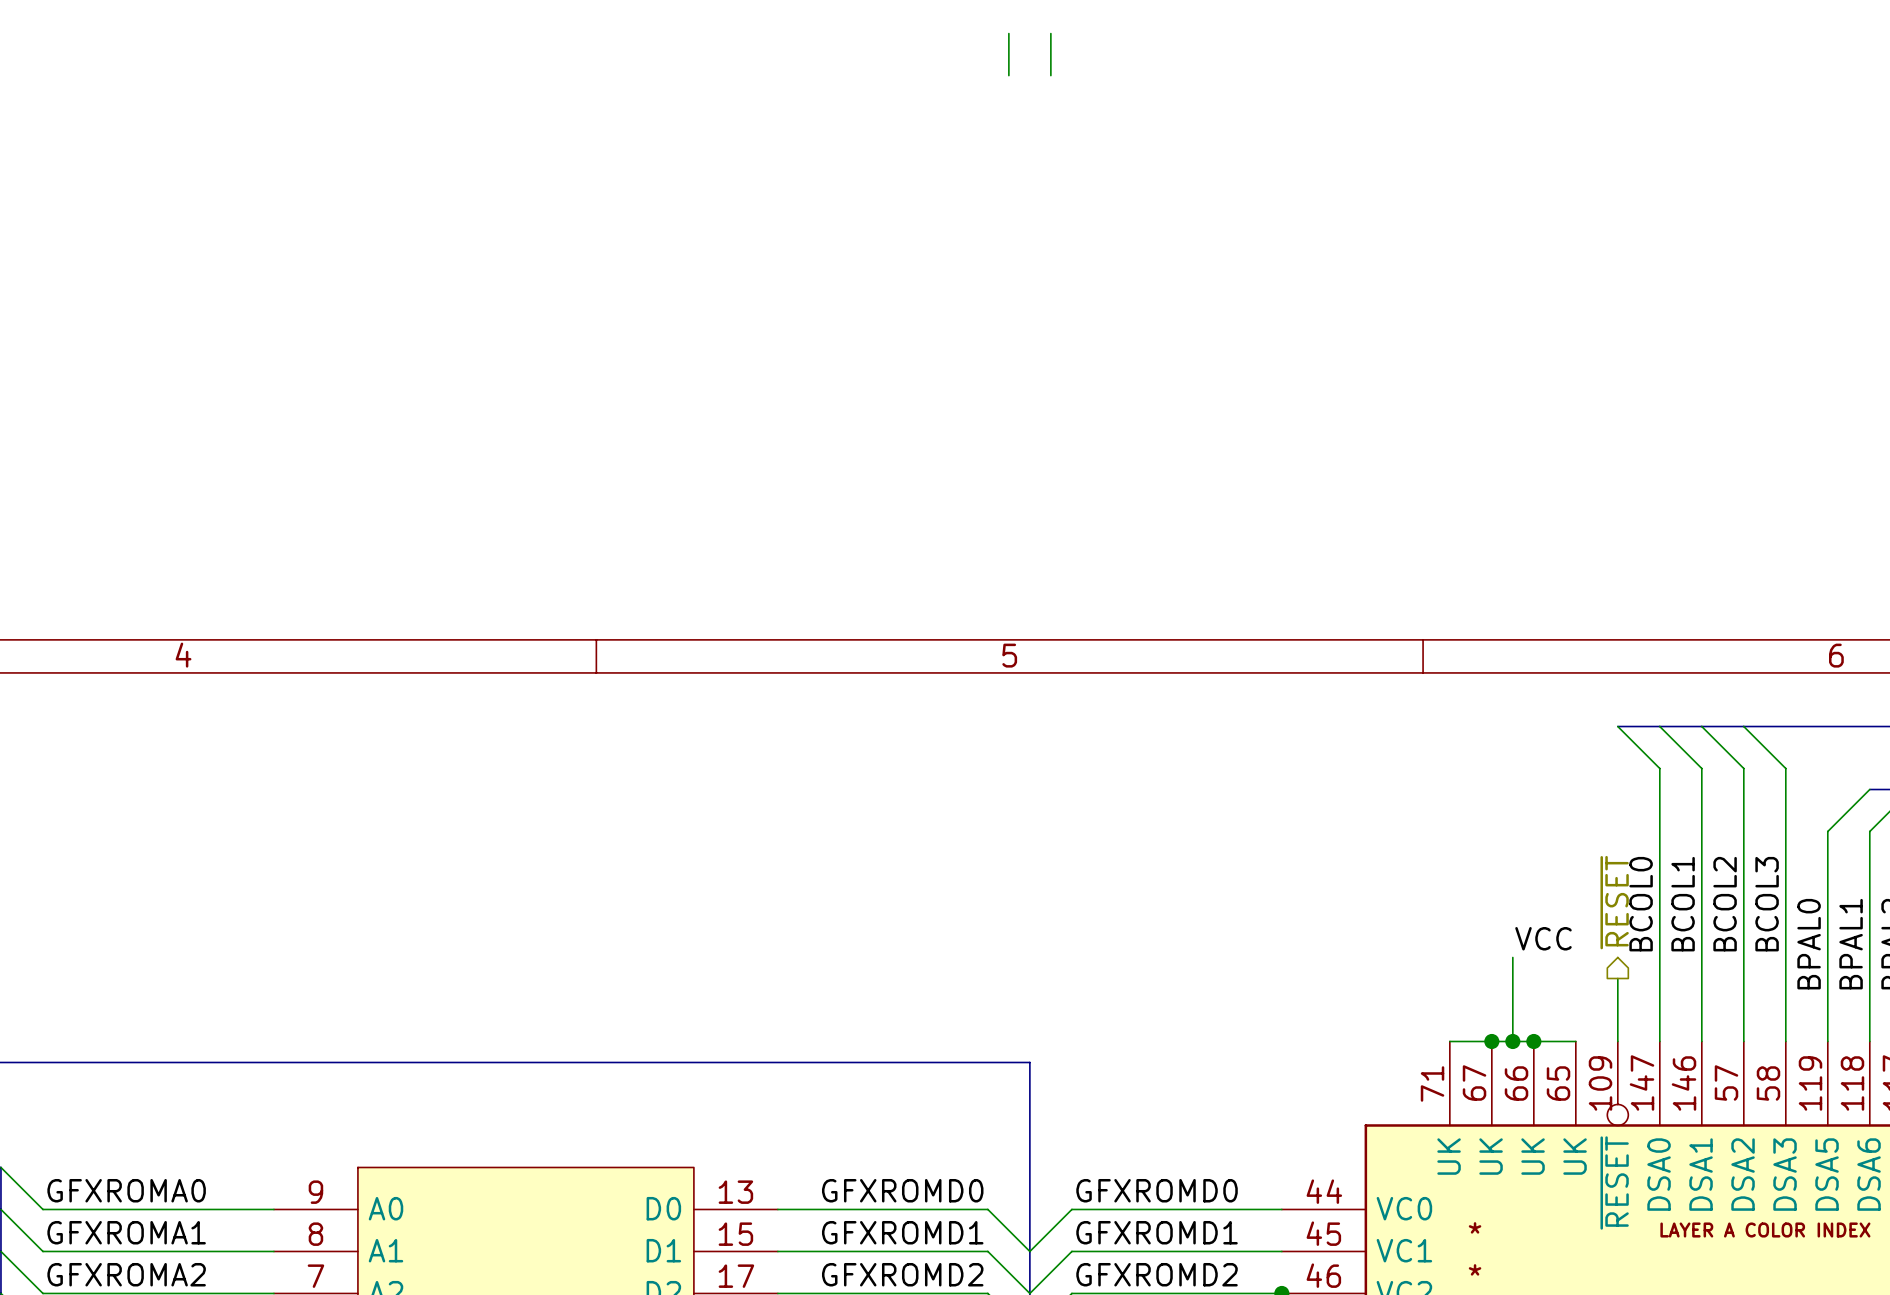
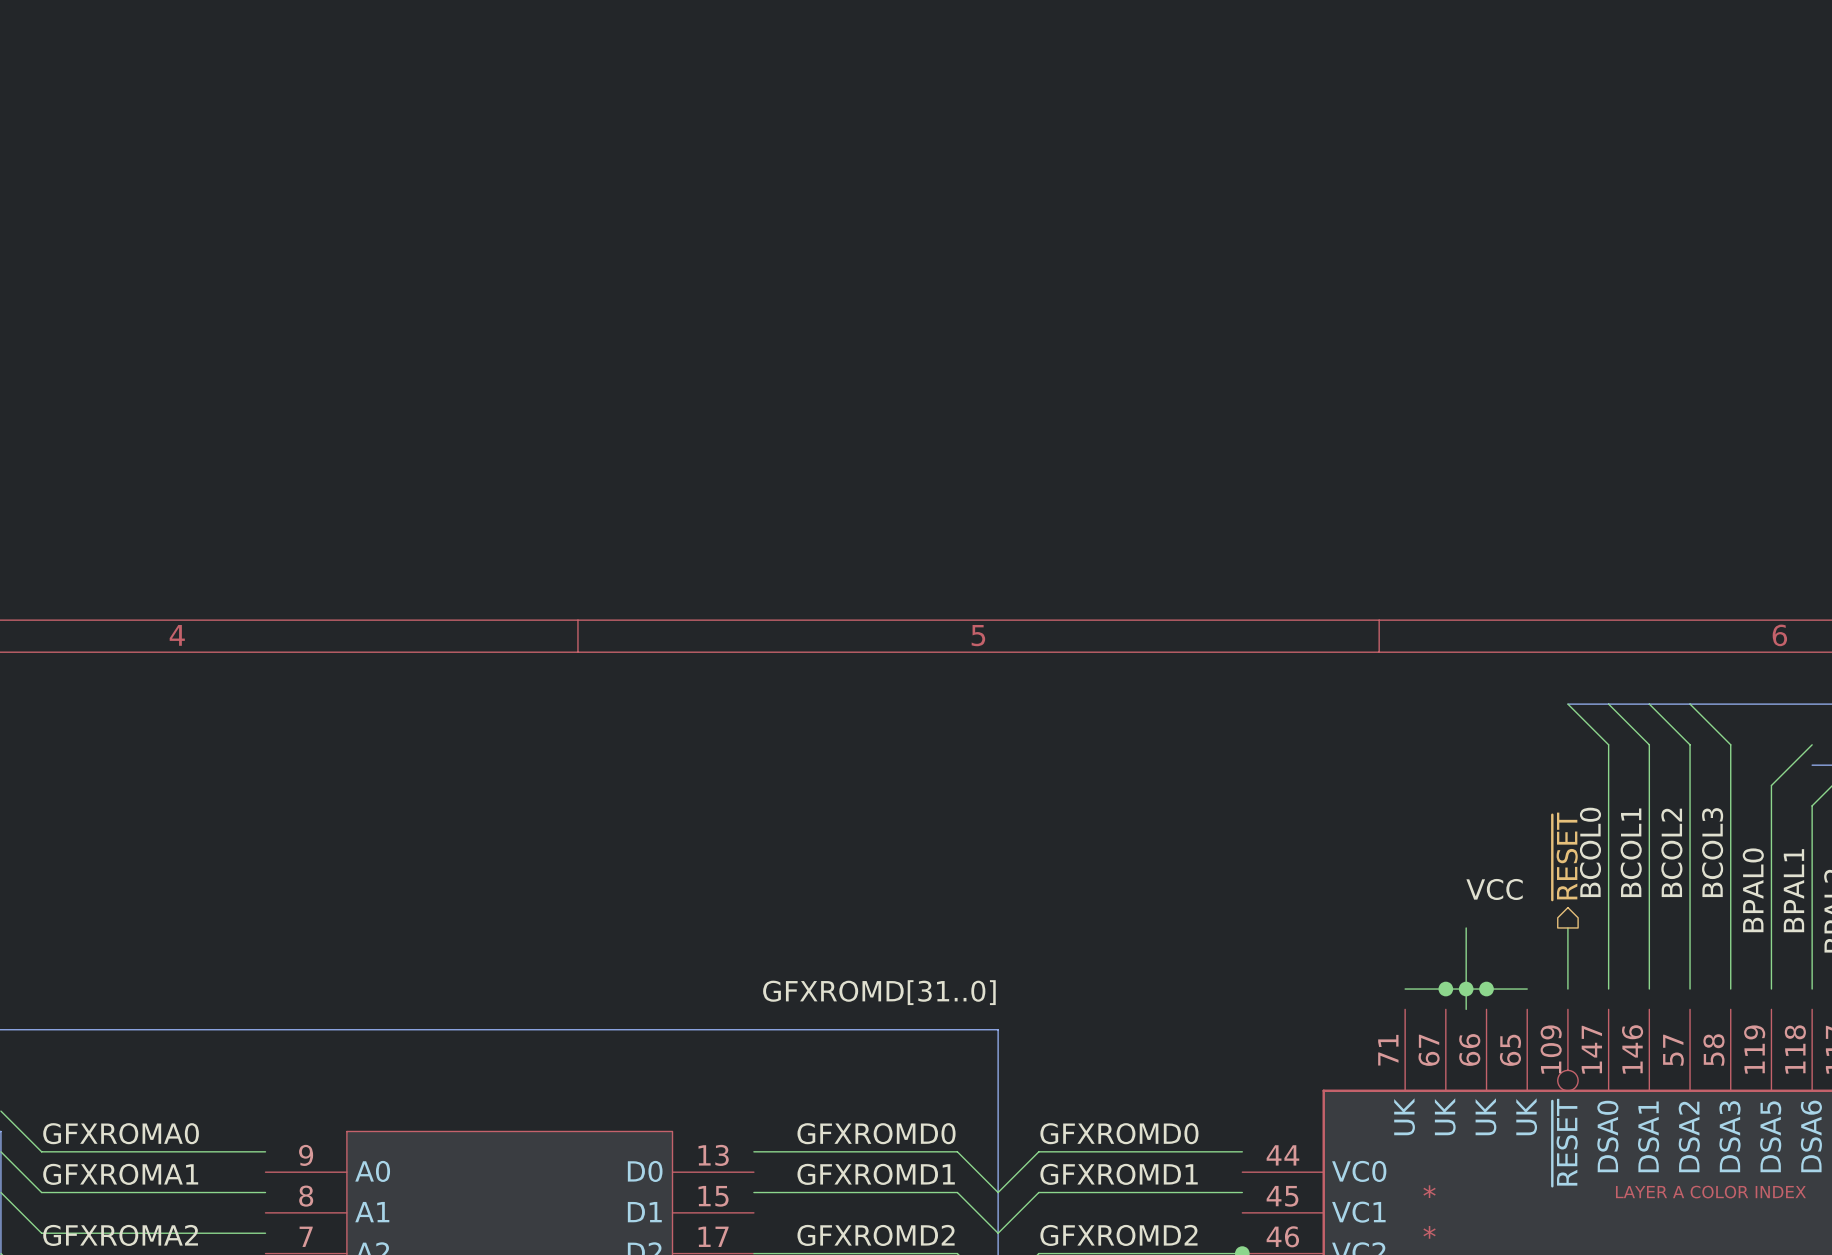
wire: (1008, 33) (1008, 75) -> none
wire: (1050, 33) (1050, 75) -> none
wire: (1869, 789) (1827, 831) -> (1812, 744) (1771, 785) (1771, 805)
hierarchical label position: ~{RESET} (1614, 902) -> ~{RESET} (1565, 856)
label position: BCOL0 (1641, 904) -> BCOL0 (1590, 852)
label position: BCOL1 (1683, 904) -> BCOL1 (1631, 852)
label position: BCOL2 (1725, 904) -> BCOL2 (1671, 852)
label position: BCOL3 (1767, 904) -> BCOL3 (1712, 852)
label position: VCC (1543, 938) -> VCC (1494, 889)
label position: BPAL0 (1809, 944) -> BPAL0 (1753, 890)
label position: BPAL1 (1851, 944) -> BPAL1 (1793, 890)
junction: none -> (1445, 989)
junction: none -> (1466, 989)
junction: none -> (1486, 989)
wire: (1617, 1020) (1617, 1041) -> (1567, 927) (1567, 948)
wire: (1659, 1020) (1659, 1041) -> none
wire: (1701, 1020) (1701, 1041) -> none
wire: (1743, 1020) (1743, 1041) -> none
wire: (1785, 1020) (1785, 1041) -> none
wire: (1827, 1020) (1827, 1041) -> none
wire: (1869, 1020) (1869, 1041) -> none
label: none -> GFXROMD[31..0] (879, 992)
wire: (1449, 1041) (1575, 1041) -> (1405, 989) (1527, 989)
junction: (1491, 1041) -> none
junction: (1512, 1041) -> none
junction: (1533, 1041) -> none
wire: (0, 1167) (42, 1209) (273, 1209) -> (0, 1111) (41, 1151) (265, 1151)
label position: GFXROMA0 (126, 1190) -> GFXROMA0 (121, 1133)
label position: GFXROMD0 (902, 1190) -> GFXROMD0 (876, 1133)
label position: GFXROMD0 (1157, 1190) -> GFXROMD0 (1119, 1133)
wire: (0, 1209) (42, 1251) (273, 1251) -> (0, 1151) (41, 1192) (265, 1192)
wire: (777, 1209) (987, 1209) (1029, 1251) (1071, 1209) (1281, 1209) -> (753, 1151) (957, 1151) (998, 1192) (1038, 1151) (1242, 1151)
label position: GFXROMA1 (126, 1232) -> GFXROMA1 (120, 1174)
label position: GFXROMD1 (902, 1232) -> GFXROMD1 (876, 1174)
label position: GFXROMD1 (1157, 1232) -> GFXROMD1 (1119, 1174)
wire: (0, 1251) (42, 1293) (273, 1293) -> (0, 1192) (41, 1233) (265, 1233)
wire: (777, 1251) (987, 1251) (1029, 1293) (1071, 1251) (1281, 1251) -> (753, 1192) (957, 1192) (998, 1233) (1038, 1192) (1242, 1192)

